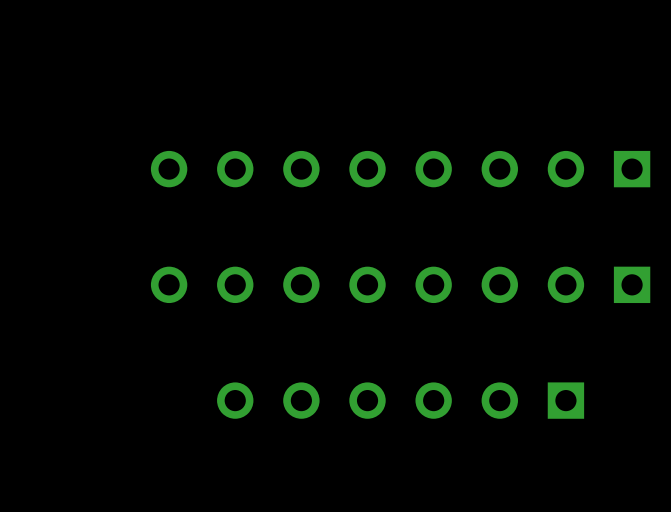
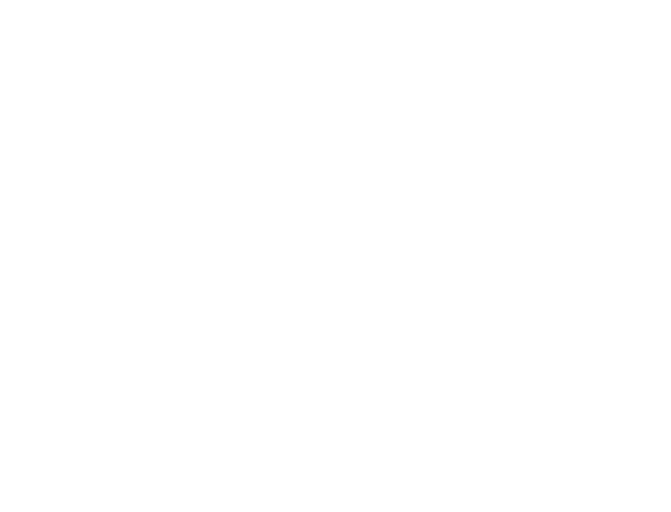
part: (400, 169) -> none
part: (400, 284) -> none
part: (400, 400) -> none

